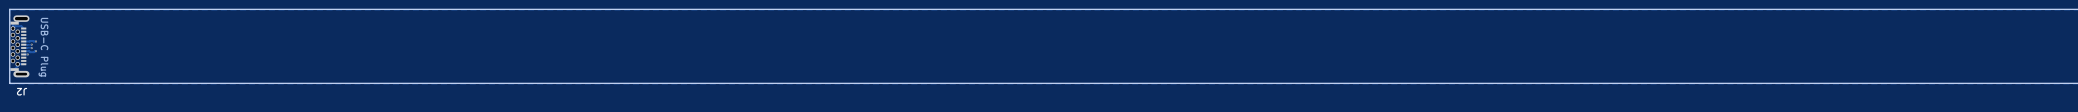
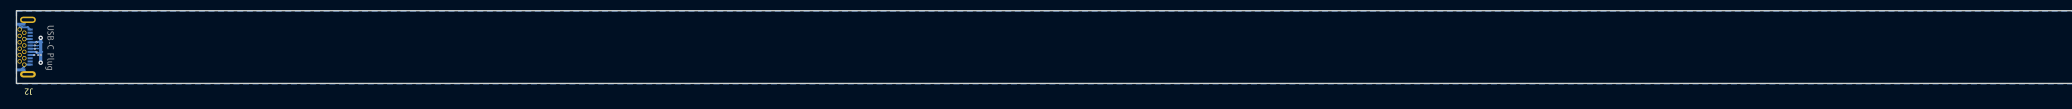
track: none -> (40, 37) (40, 62)
via: none -> (40, 37)
via: none -> (36, 42)
via: (36, 41) -> none
via: none -> (34, 45)
via: (31, 44) -> none
via: none -> (34, 48)
via: (31, 48) -> none
via: none -> (36, 51)
via: (36, 51) -> none
via: none -> (38, 55)
via: none -> (40, 55)
via: none -> (40, 62)

